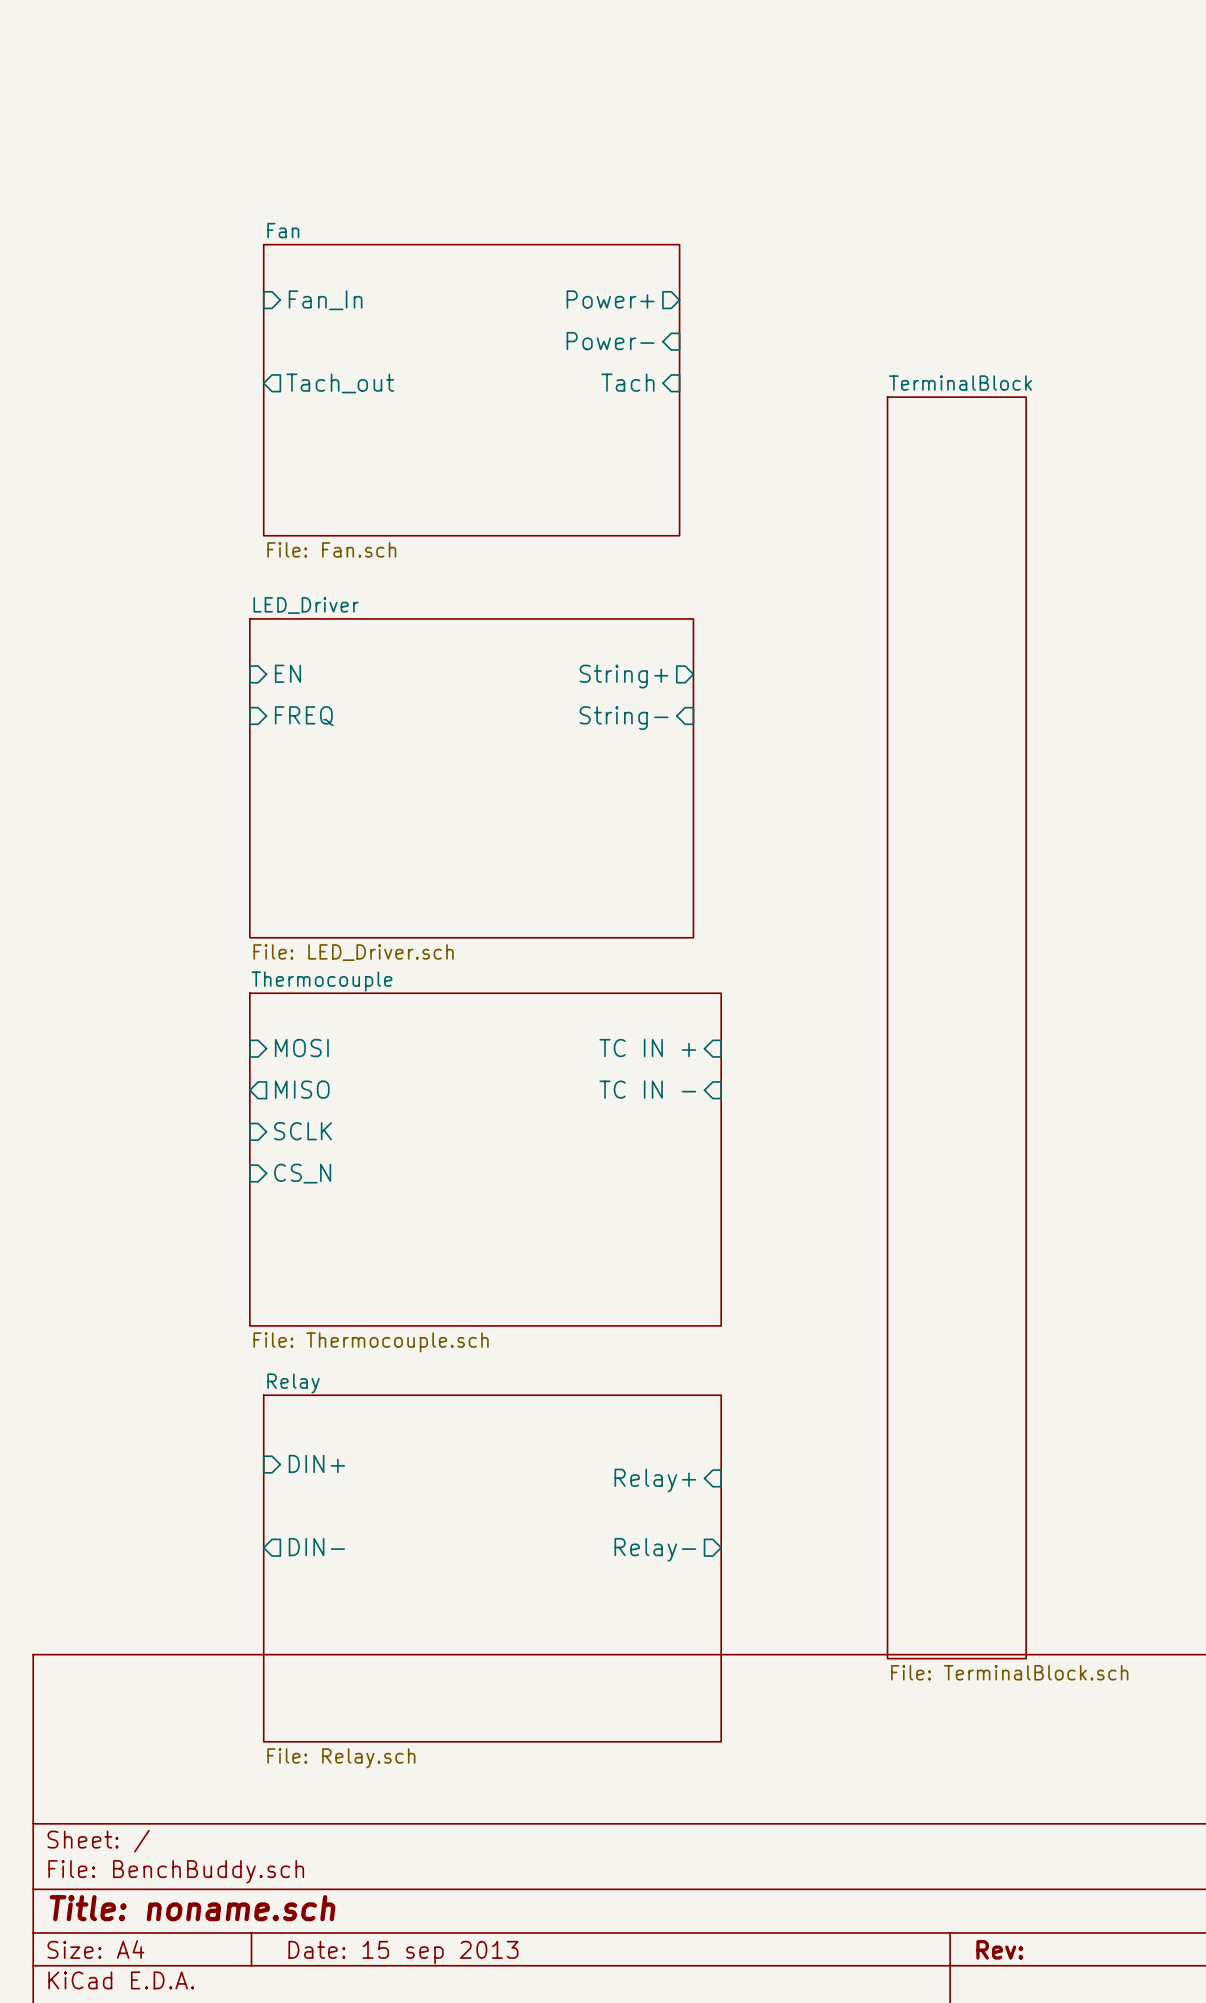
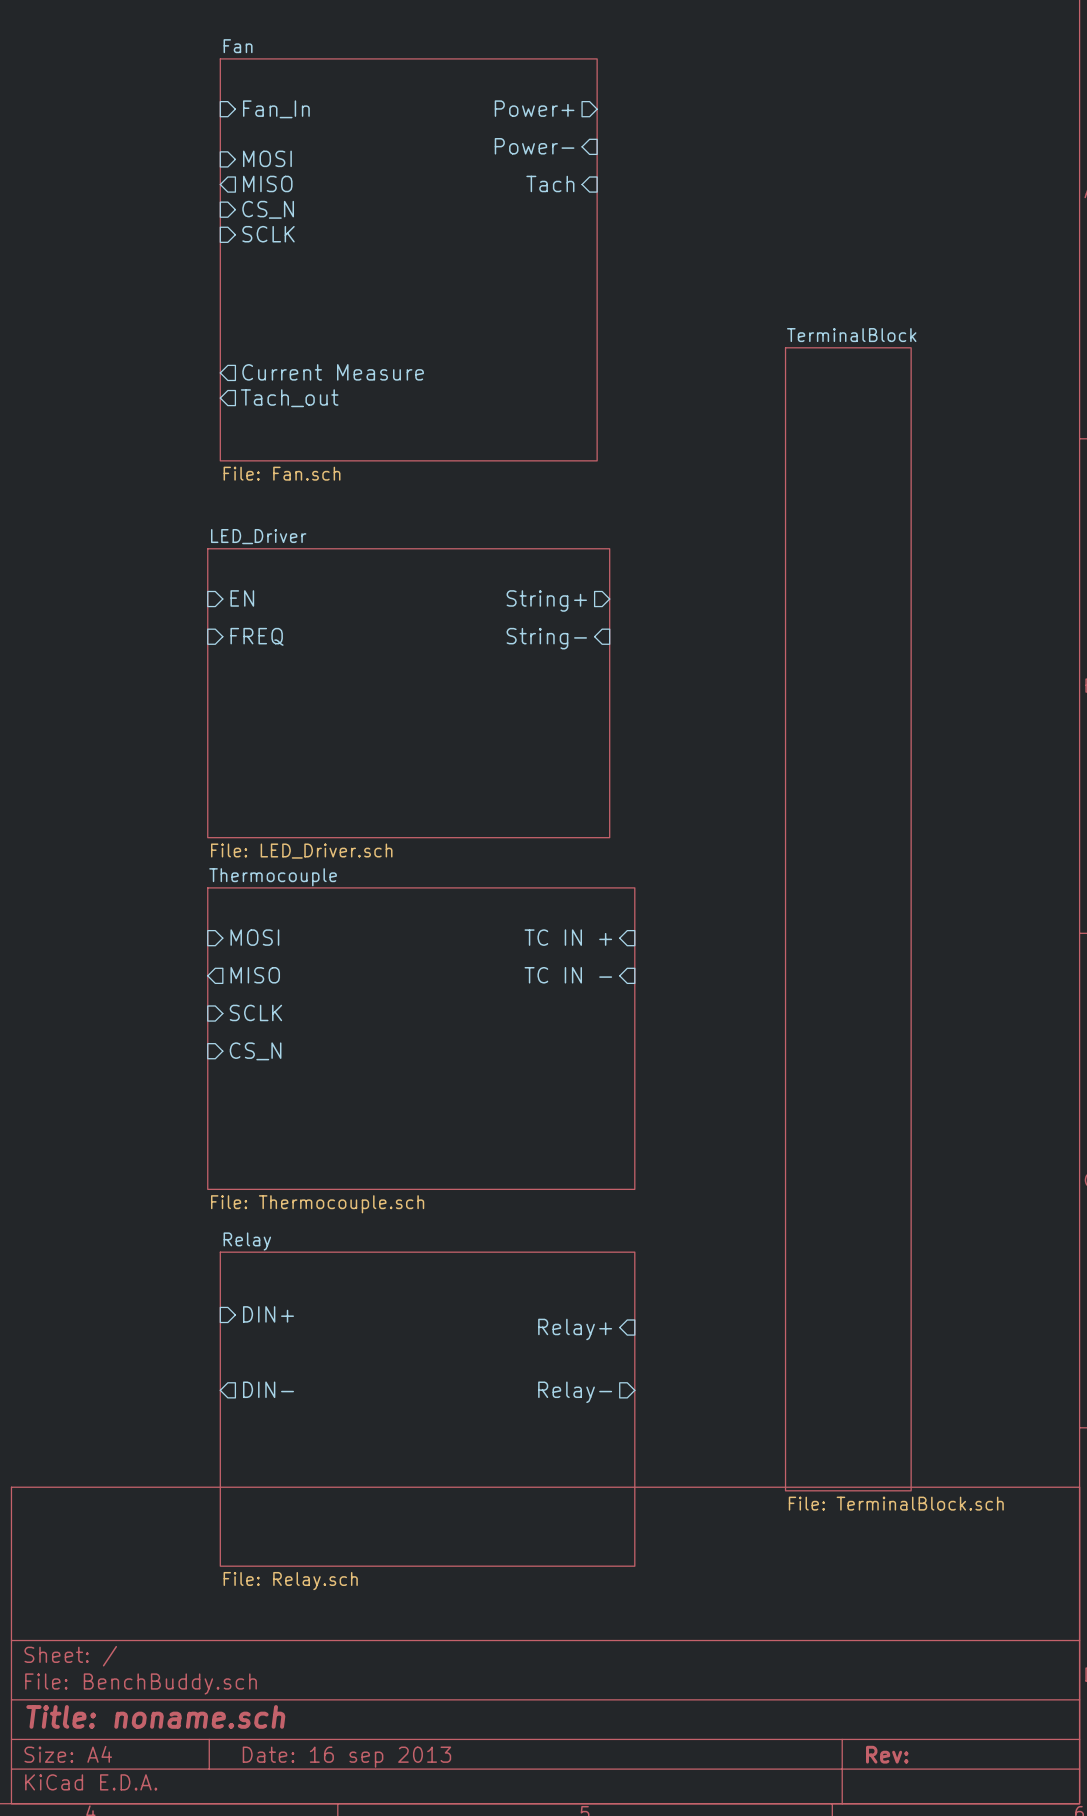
sheet pin: none -> MOSI (267, 158)
sheet pin: none -> MISO (267, 183)
sheet pin: none -> CS_N (268, 209)
sheet pin: none -> SCLK (268, 234)
sheet pin position: Power+ (610, 299) -> Power+ (534, 108)
sheet pin position: Fan_In (325, 300) -> Fan_In (276, 109)
sheet Fan: none -> File: Fan.sch (408, 259)
sheet pin position: Power- (610, 341) -> Power- (534, 146)
sheet pin position: Tach (627, 382) -> Tach (550, 183)
sheet pin position: Tach_out (340, 383) -> Tach_out (289, 398)
sheet Fan: File: Fan.sch (471, 390) -> none
sheet pin: none -> Current Measure (333, 372)
title block: Date: 15 sep 2013 (403, 1952) -> Date: 16 sep 2013 (346, 1757)

